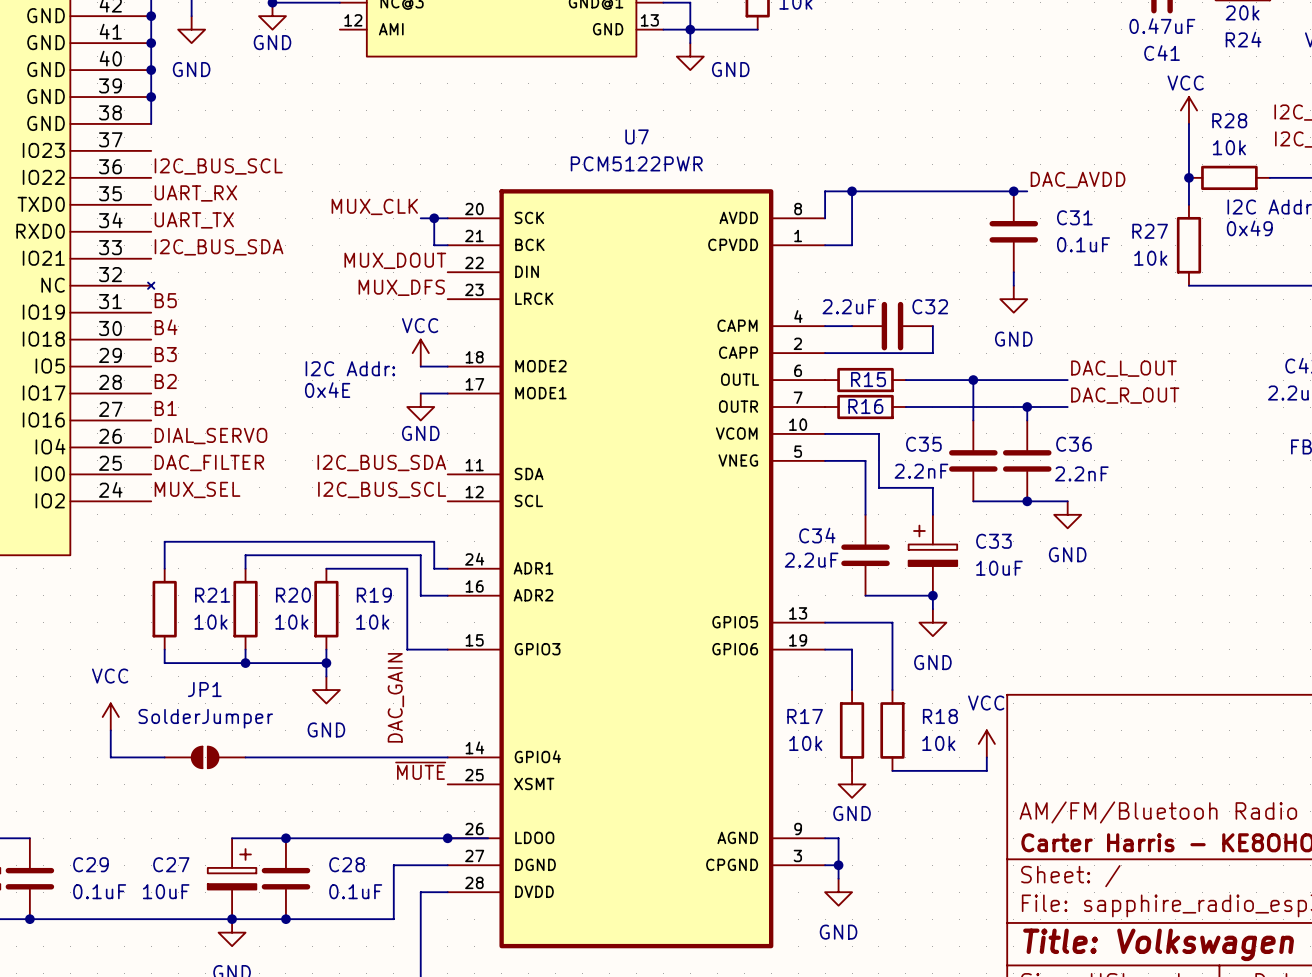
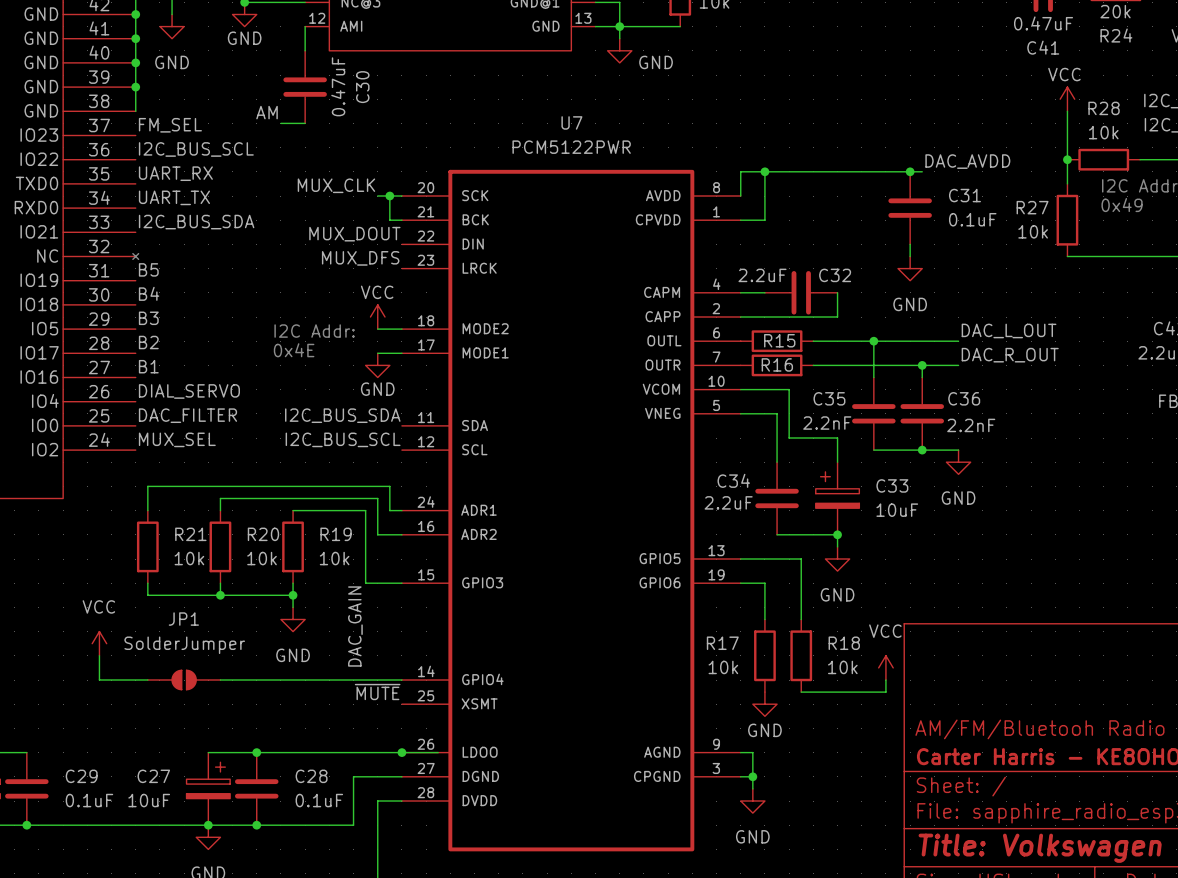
wire: none -> (305, 26) (305, 50)
C30: none -> 0.47uF (305, 87)
label: none -> AM (267, 112)
wire: none -> (280, 123) (305, 123)
label: none -> FM_SEL (170, 125)

